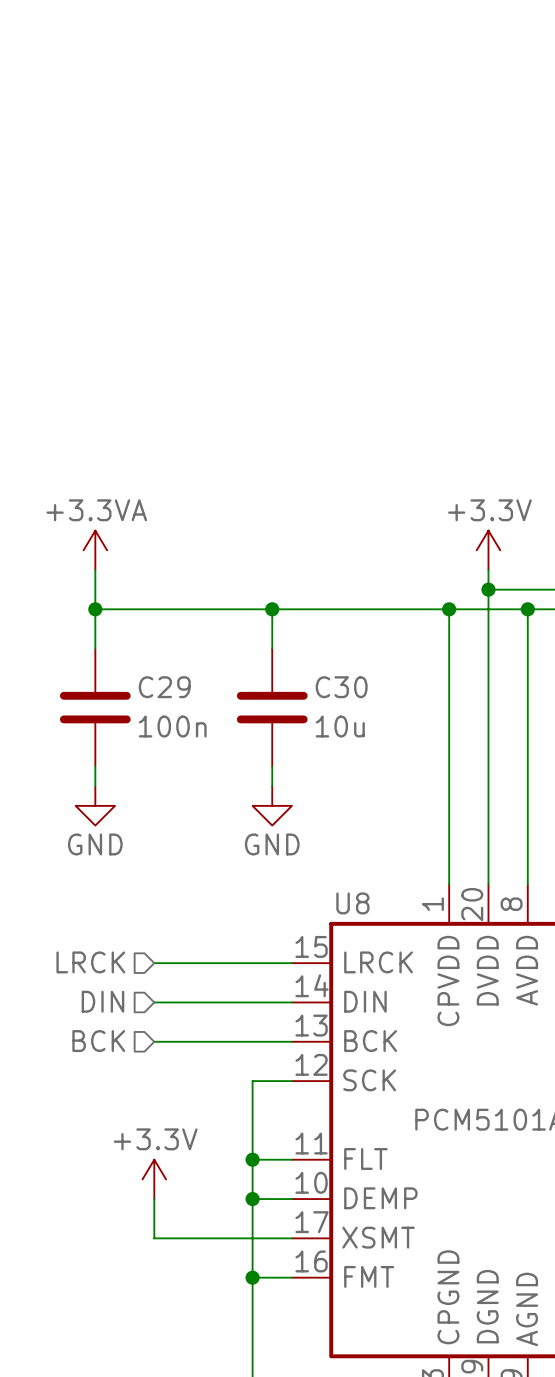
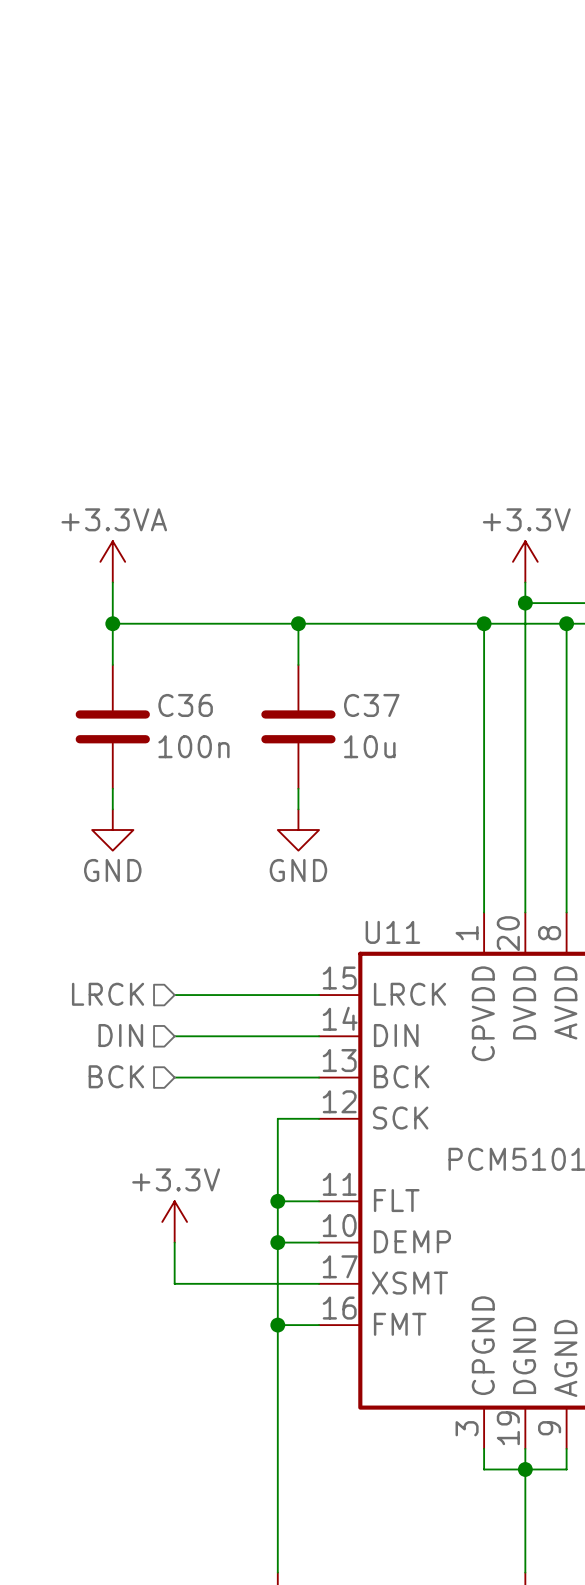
C29 name: C29 (164, 687) -> C36 (185, 705)
C30 name: C30 (341, 687) -> C37 (371, 705)
U8 name: U8 (352, 903) -> U11 (392, 932)

